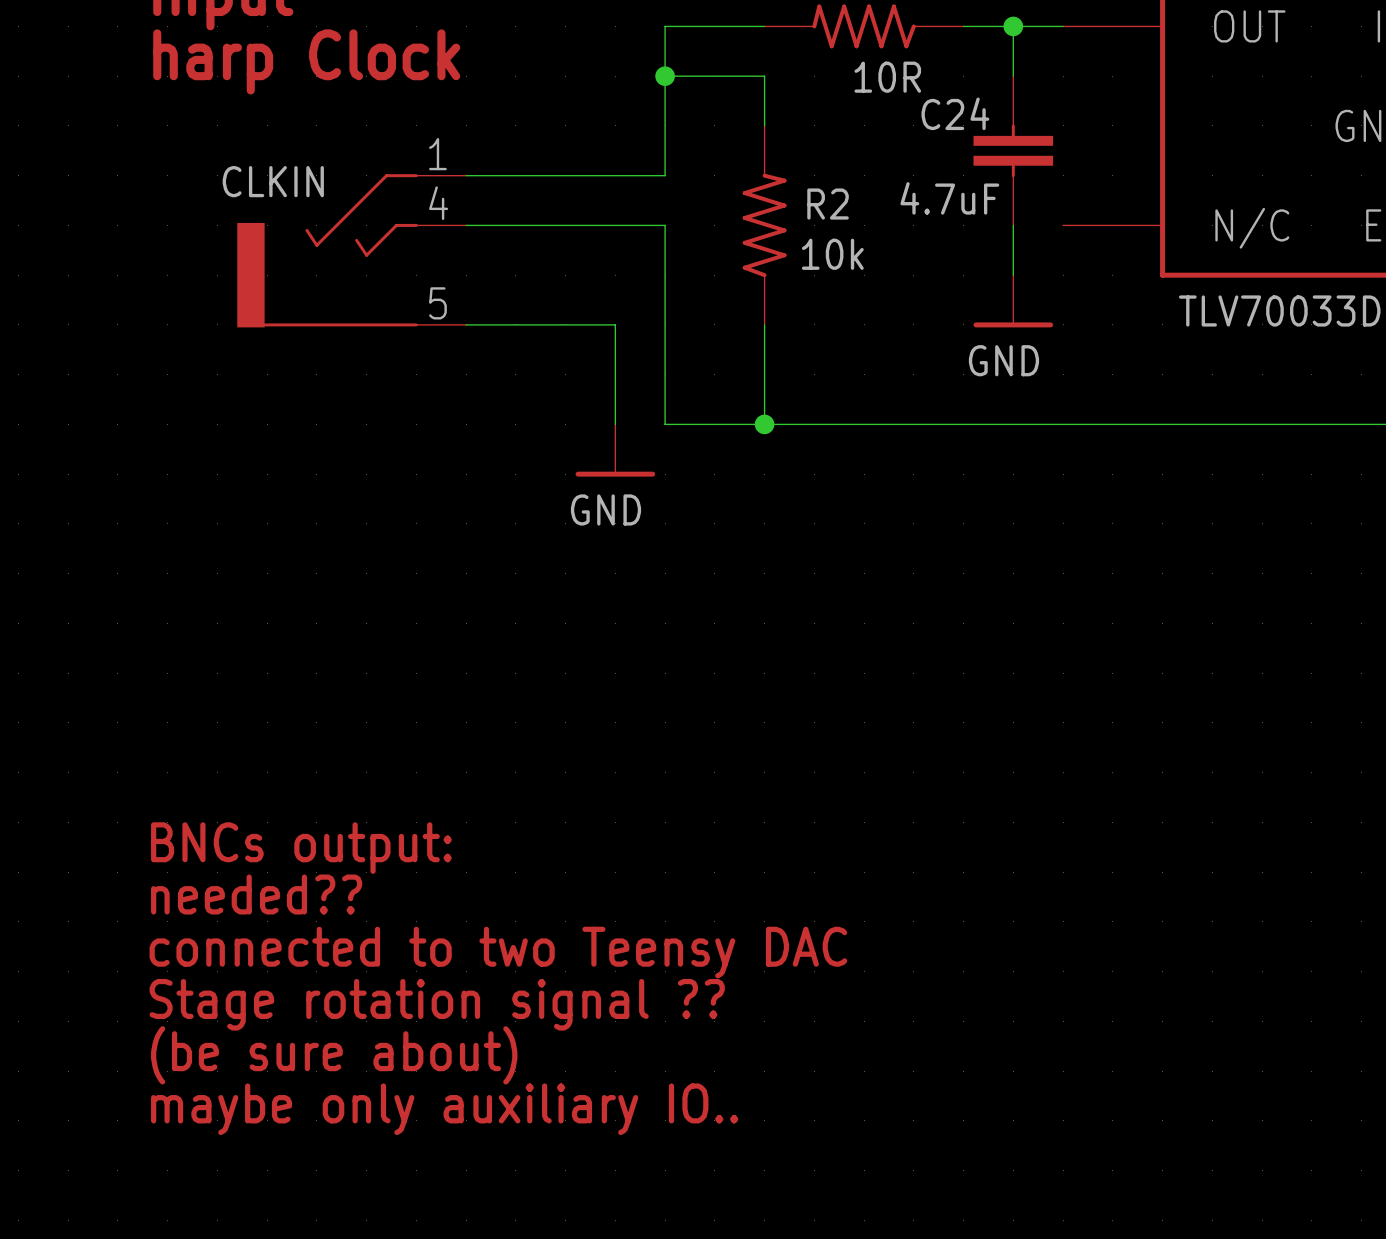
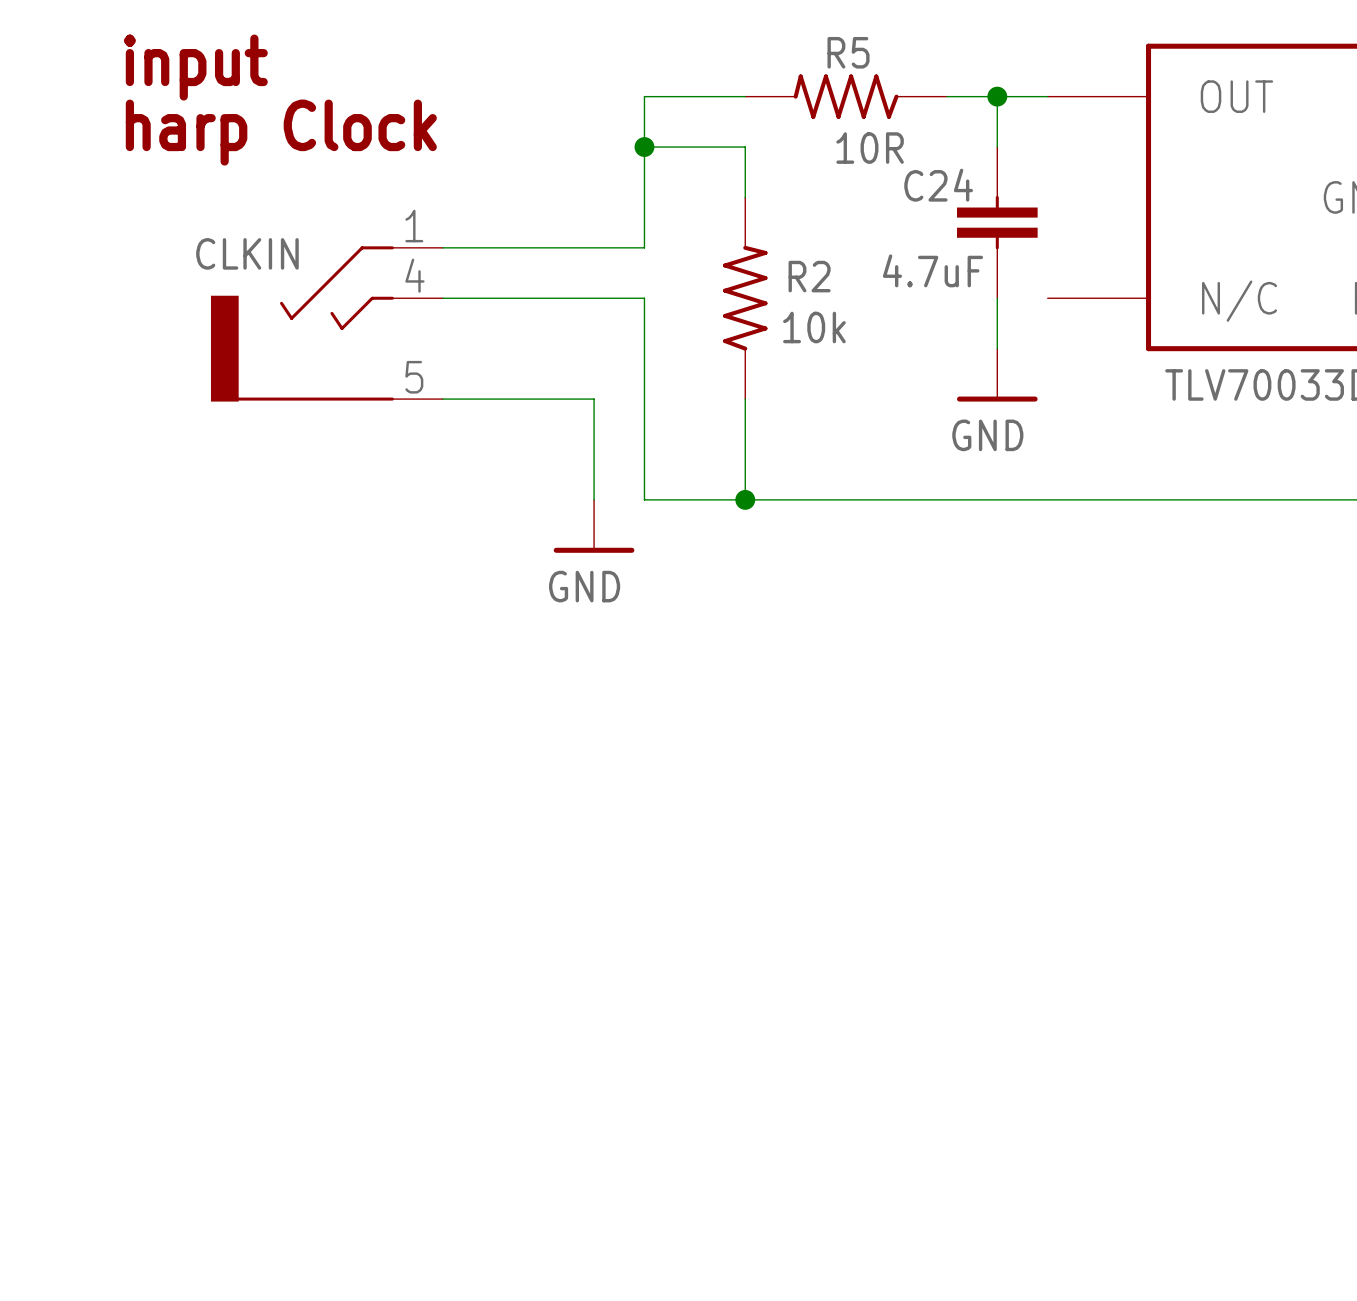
text: BNCs output: (301, 848) -> none
text: needed?? (256, 894) -> none
text: connected to two Teensy DAC (498, 952) -> none
text: Stage rotation signal ?? (437, 1004) -> none
text: (be sure about) (334, 1055) -> none
text: maybe only auxiliary IO.. (444, 1109) -> none

